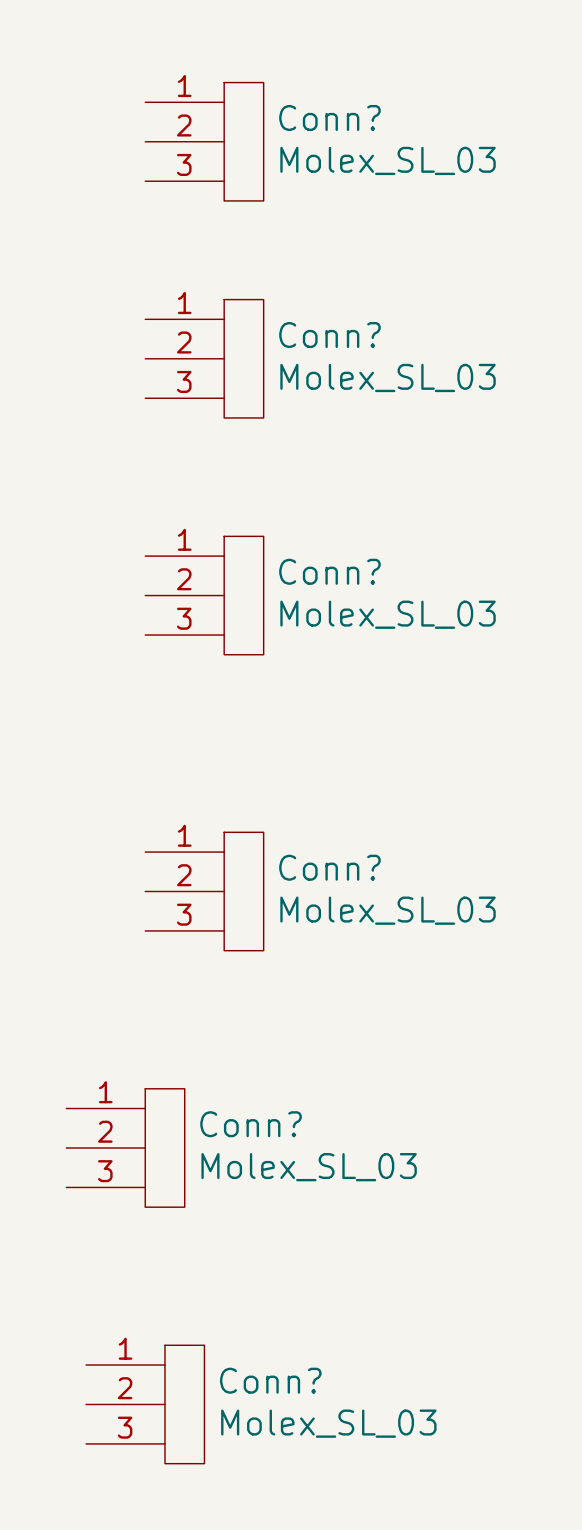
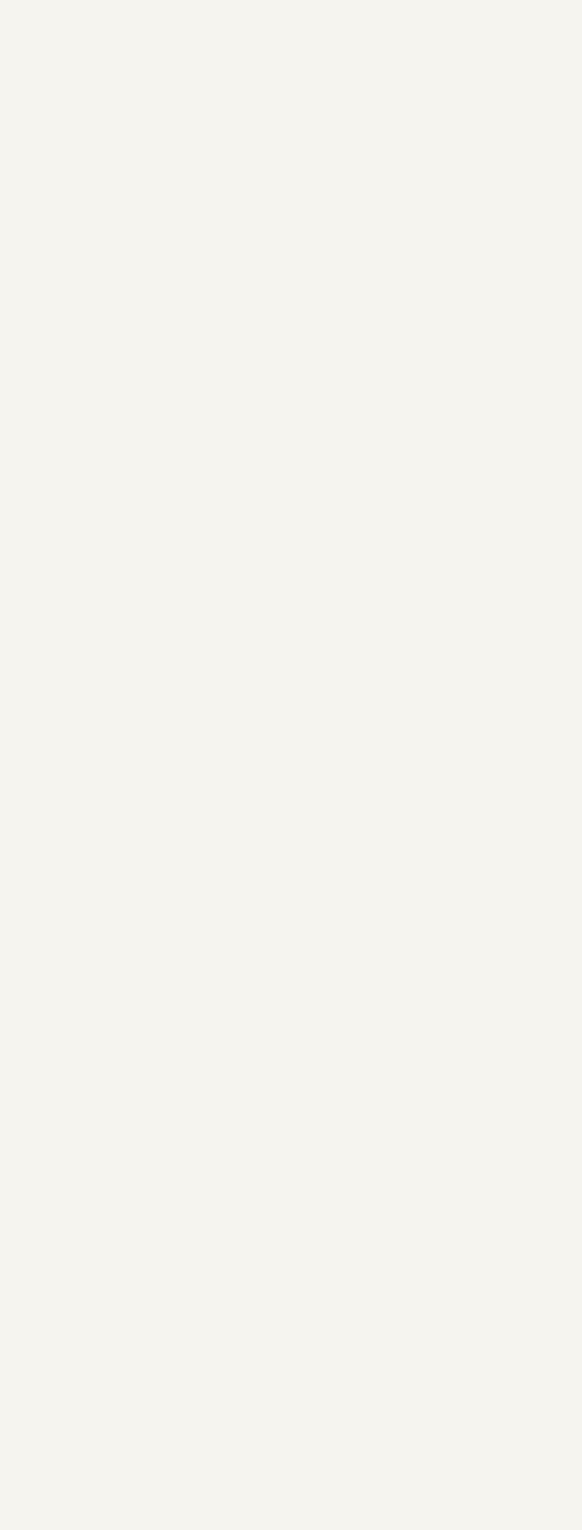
Conn?: Molex_SL_03 (204, 141) -> none
Conn?: Molex_SL_03 (204, 358) -> none
Conn?: Molex_SL_03 (204, 595) -> none
Conn?: Molex_SL_03 (204, 891) -> none
Conn?: Molex_SL_03 (125, 1147) -> none
Conn?: Molex_SL_03 (145, 1404) -> none

